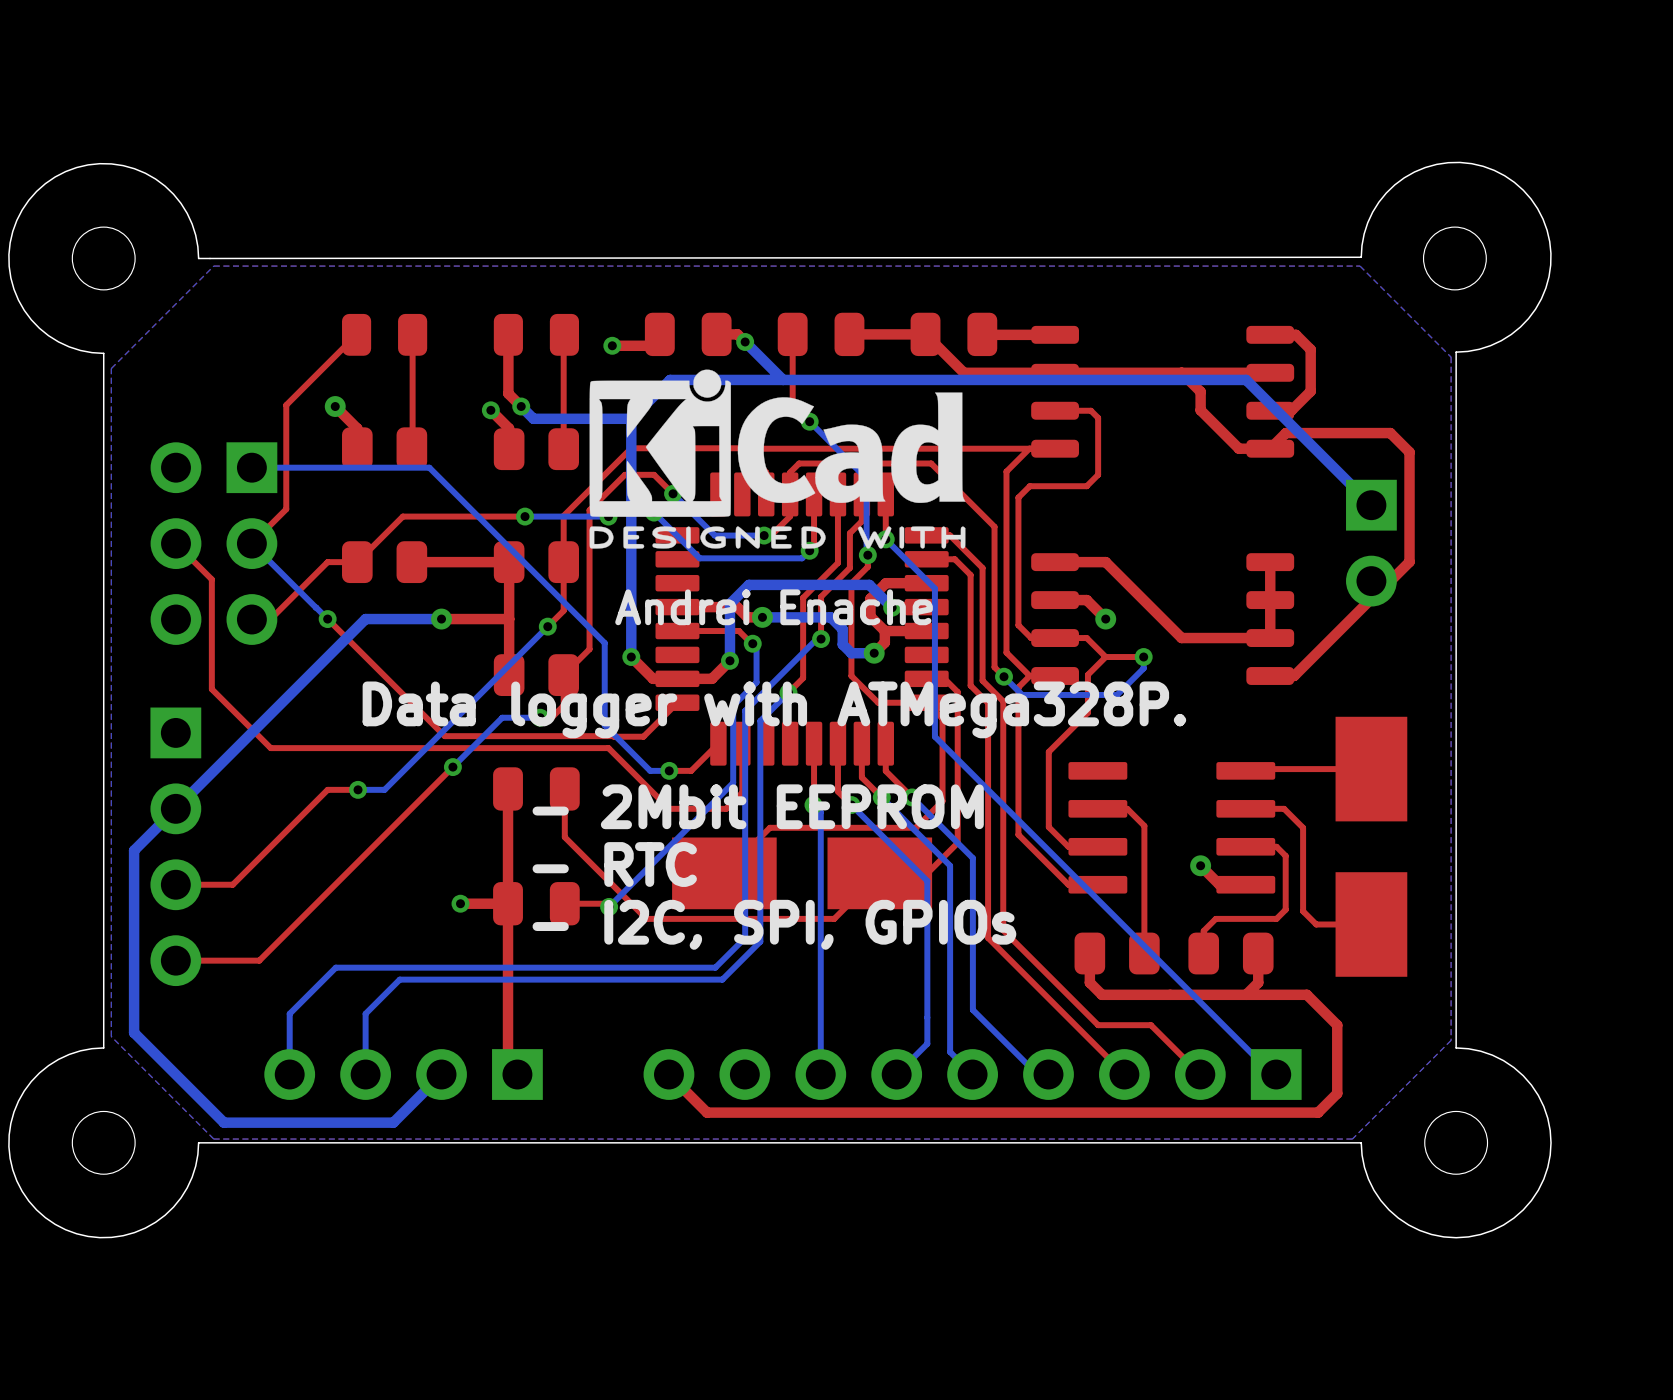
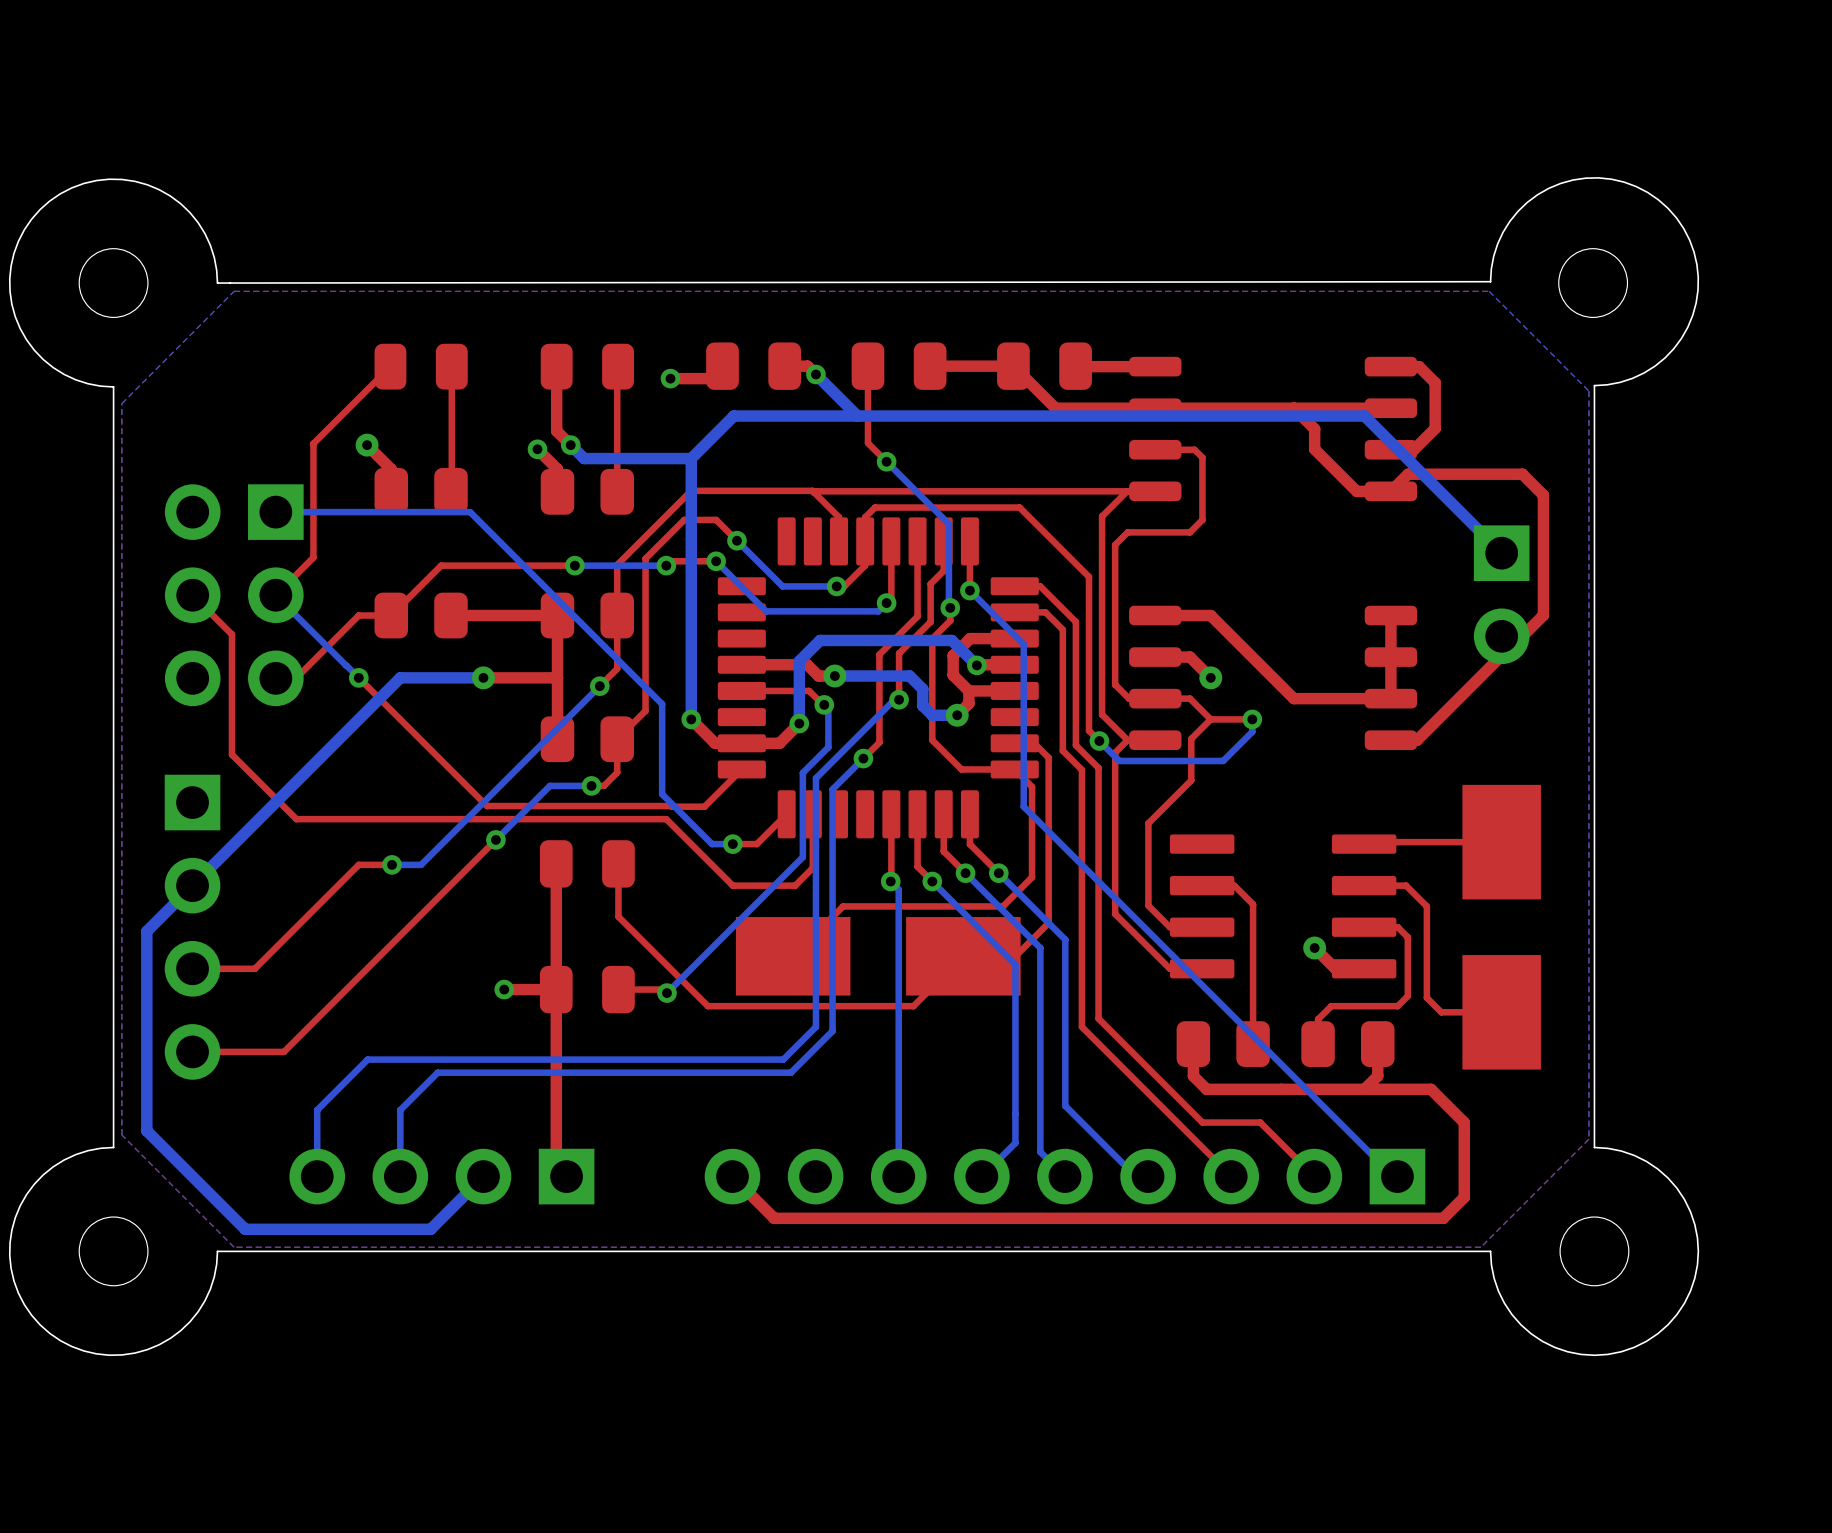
drawing: [589, 369, 966, 549] -> none
text: Andrei Enache (774, 607) -> none
text: Data logger with ATMega328P. (774, 709) -> none
text: - 2Mbit EEPROM (758, 806) -> none
text: - RTC (614, 864) -> none
text: - I2C, SPI, GPIOs (774, 924) -> none

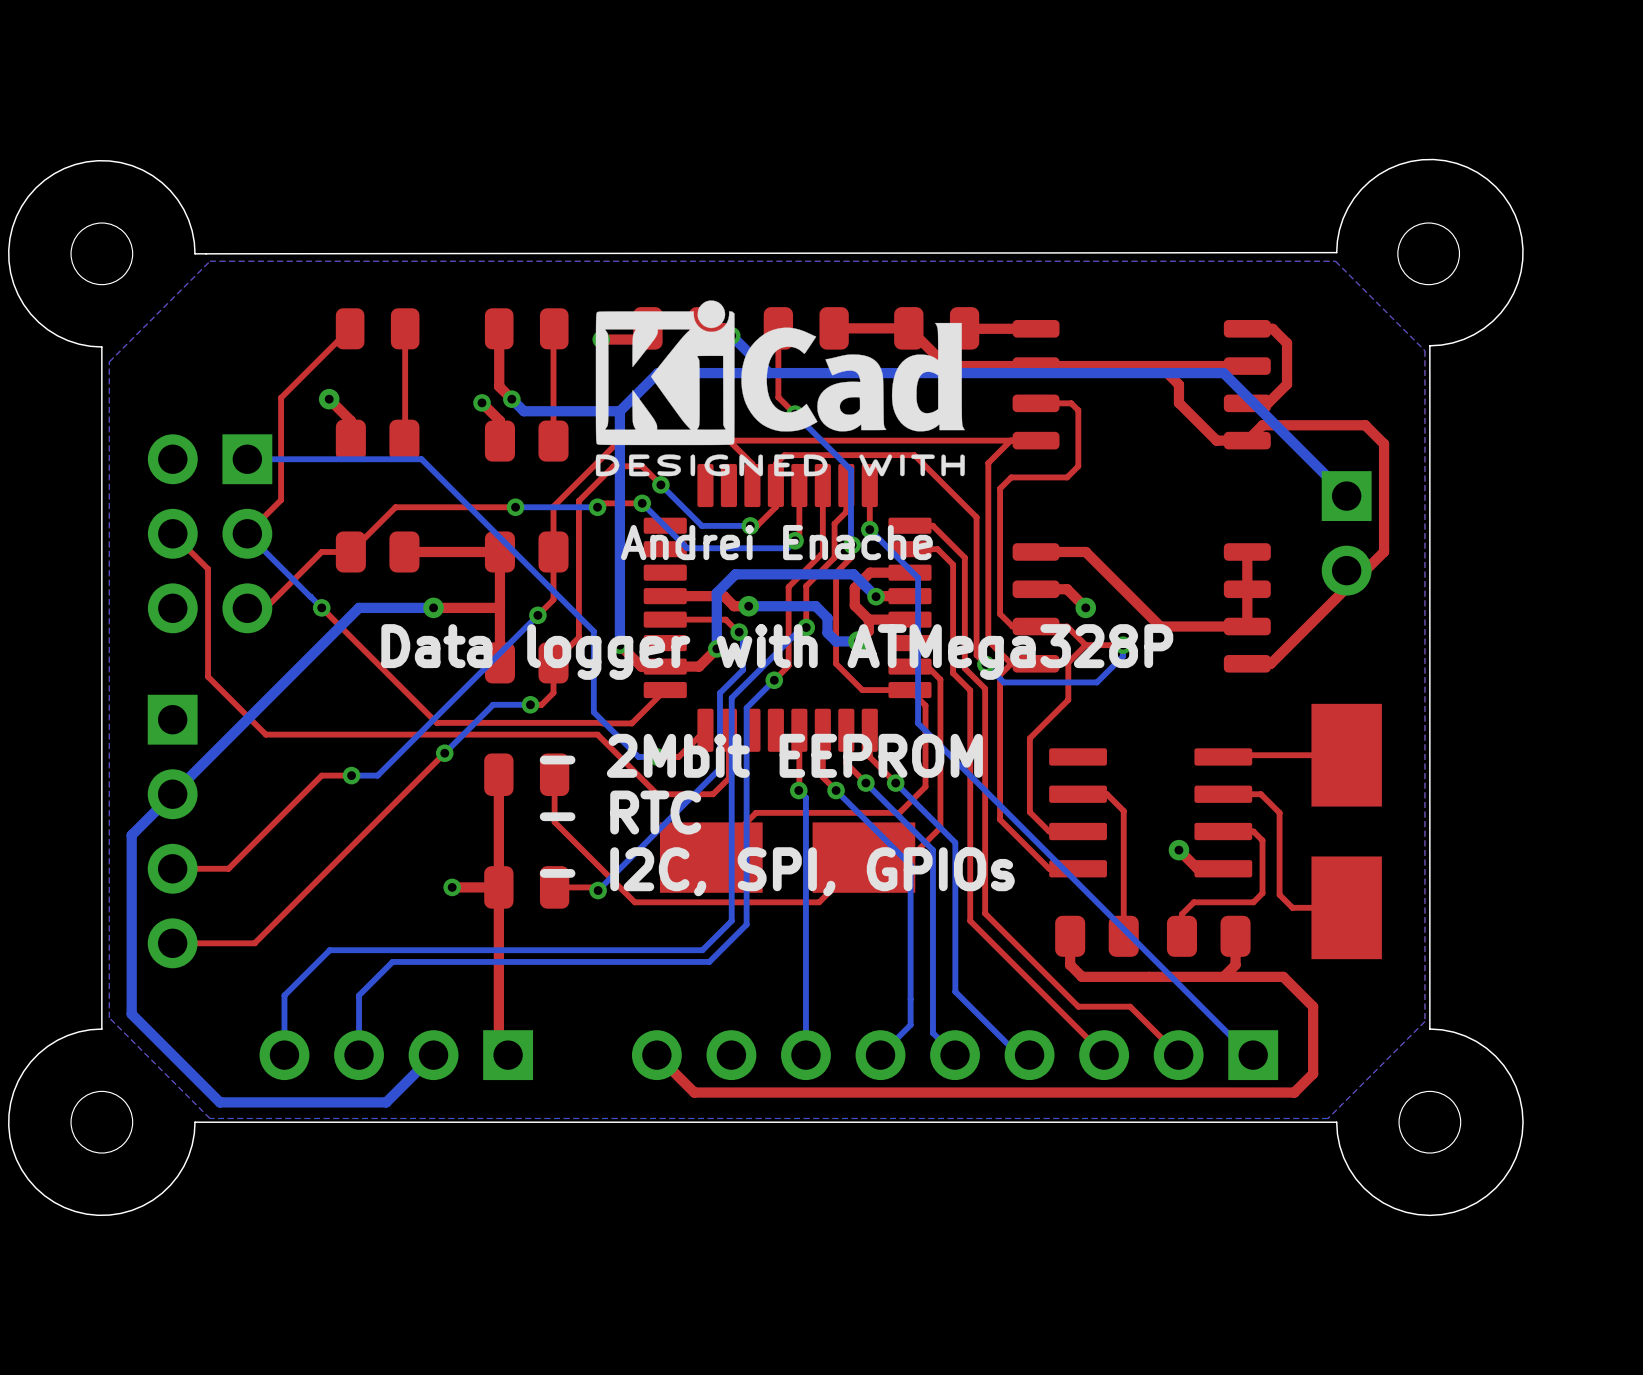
drawing: none -> [595, 300, 965, 477]
text: none -> Andrei Enache (776, 542)
text: none -> Data logger with ATMega328P (777, 651)
text: none -> - 2Mbit EEPROM (761, 755)
text: none -> - RTC (620, 812)
text: none -> - I2C, SPI, GPIOs (777, 871)

